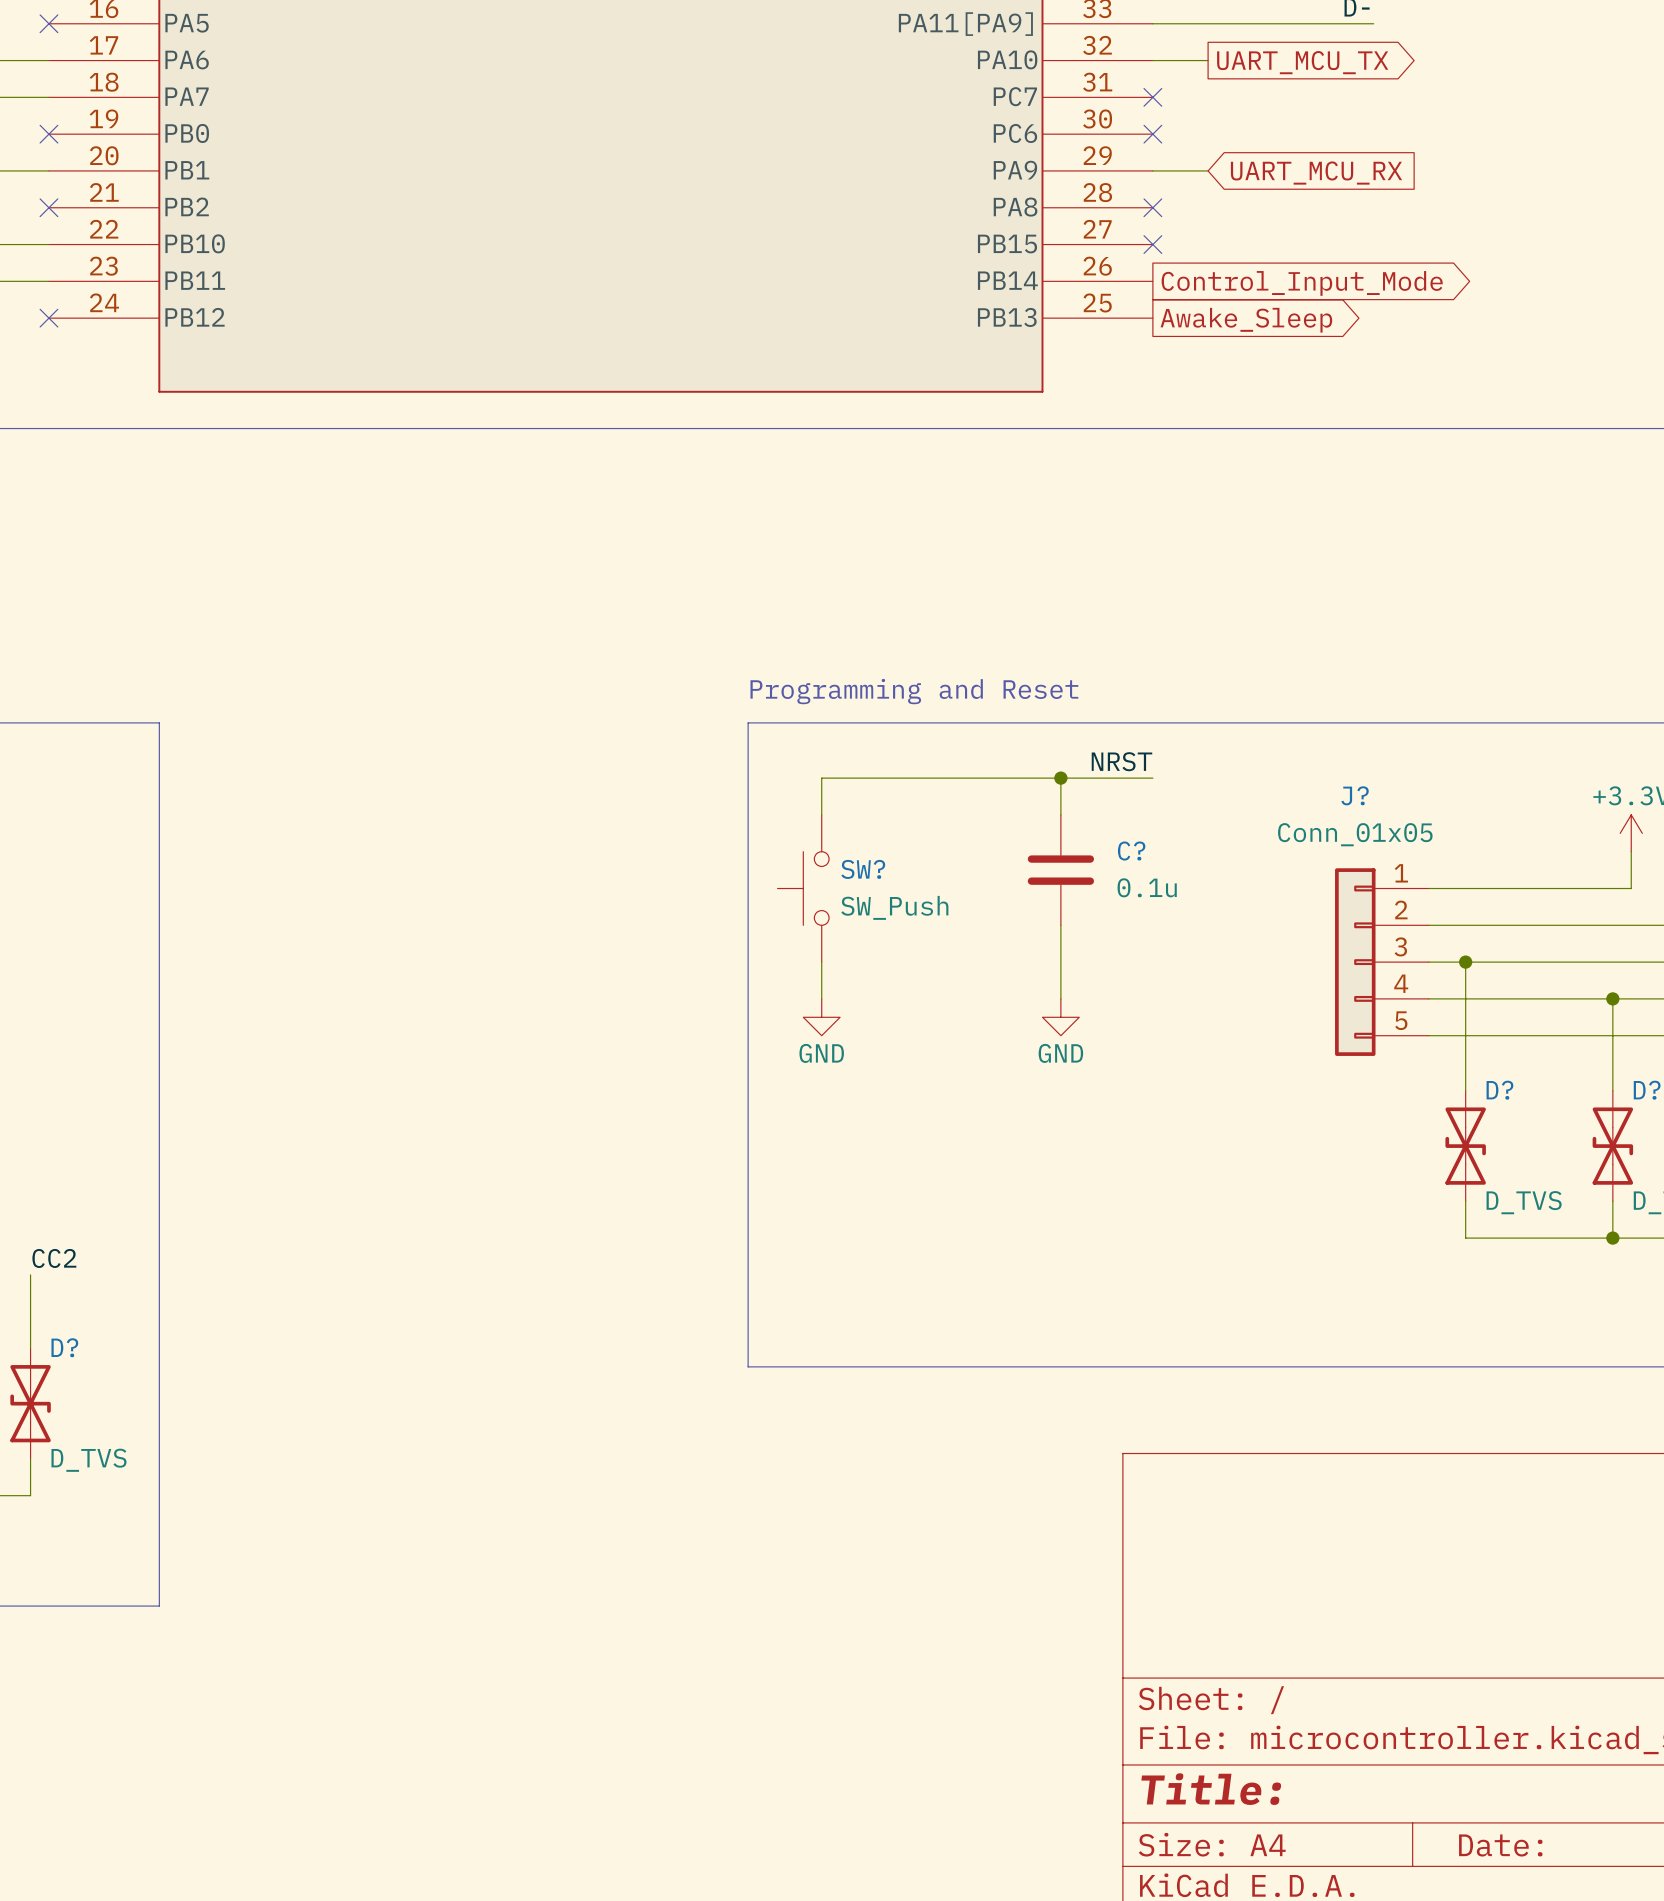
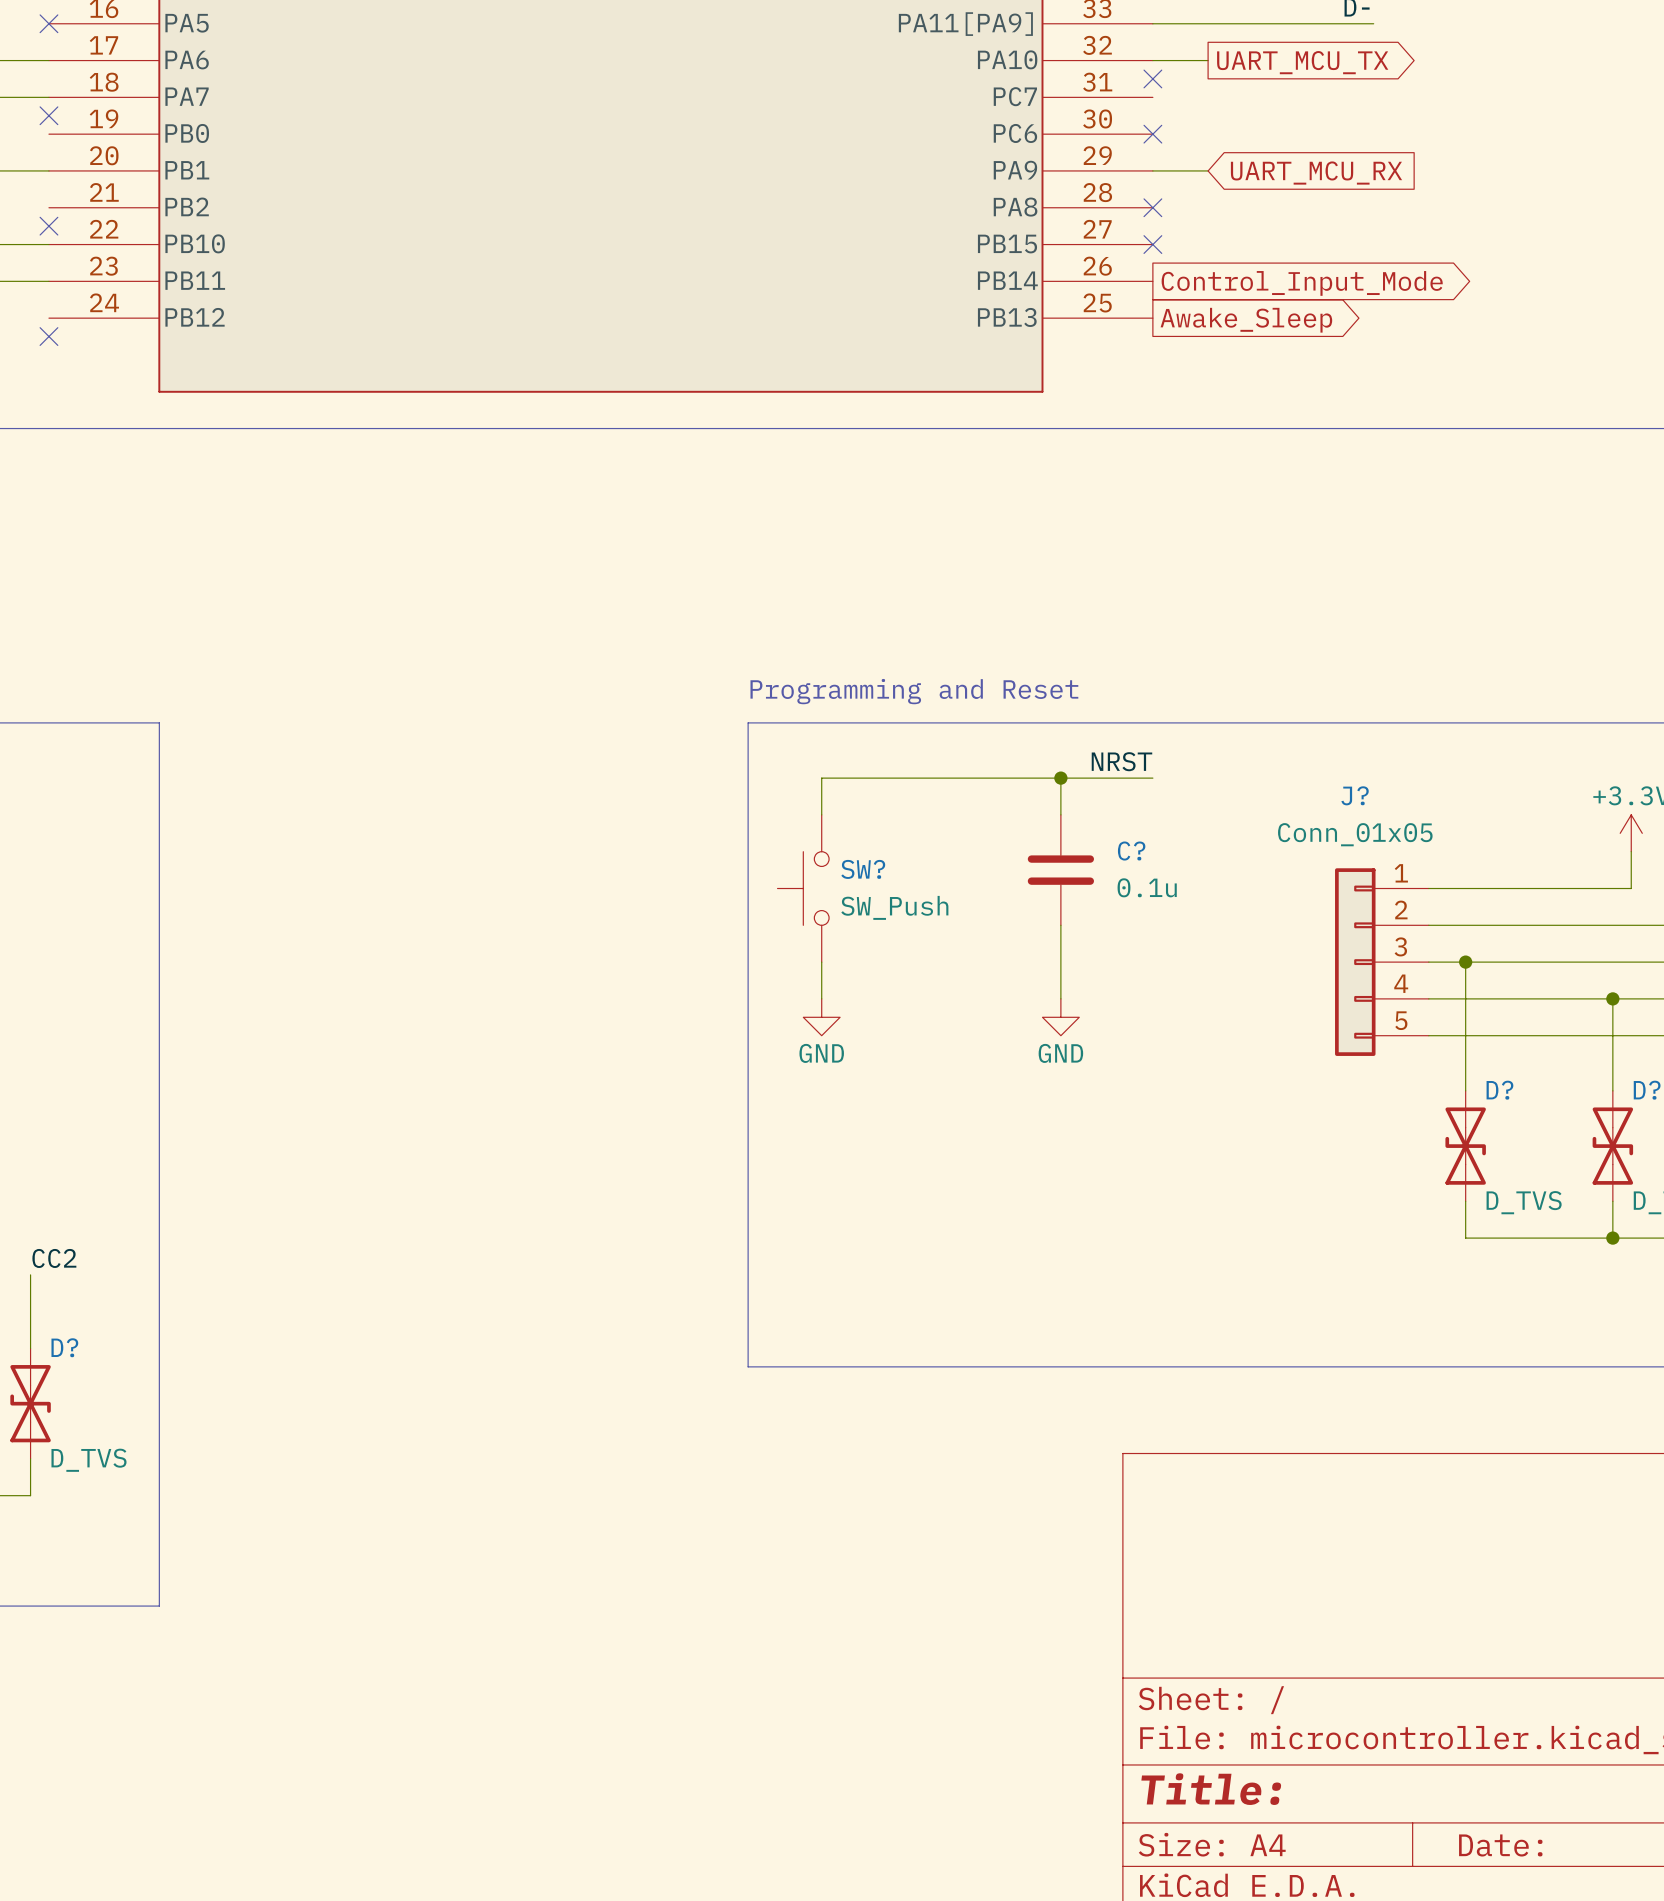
no-connect mark position: (1152, 97) -> (1152, 78)
no-connect mark position: (48, 134) -> (48, 115)
no-connect mark position: (48, 207) -> (48, 226)
no-connect mark position: (48, 318) -> (48, 336)

